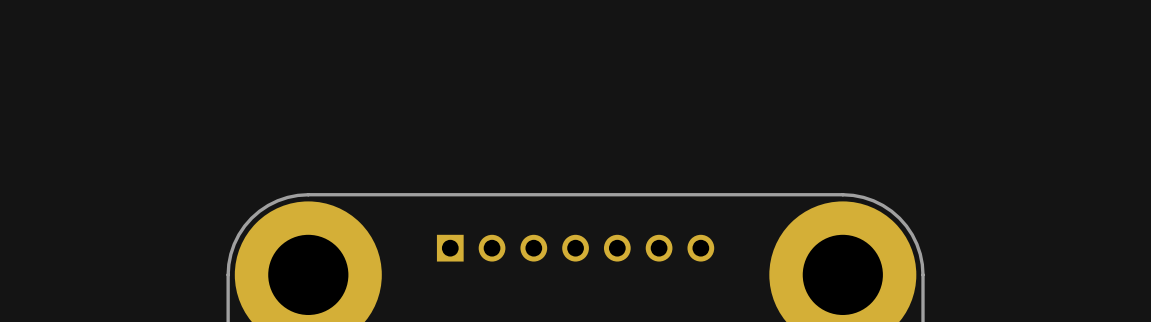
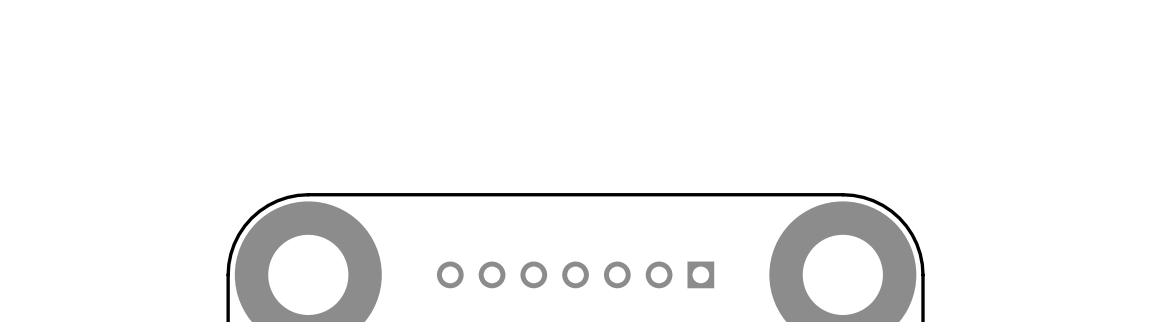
part rotation: 0° (575, 248) -> 180° (575, 274)

